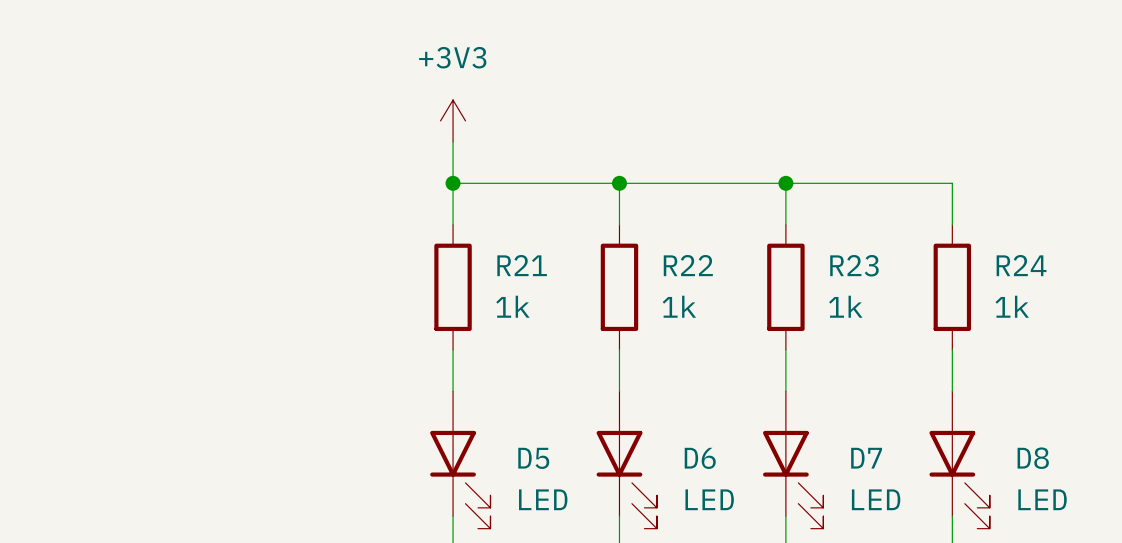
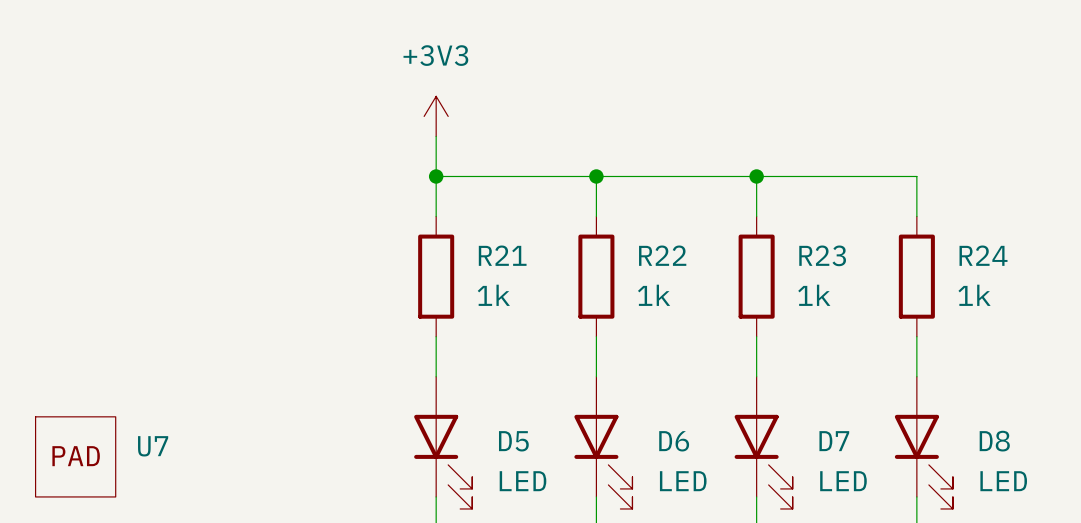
U7: none -> (75, 456)

